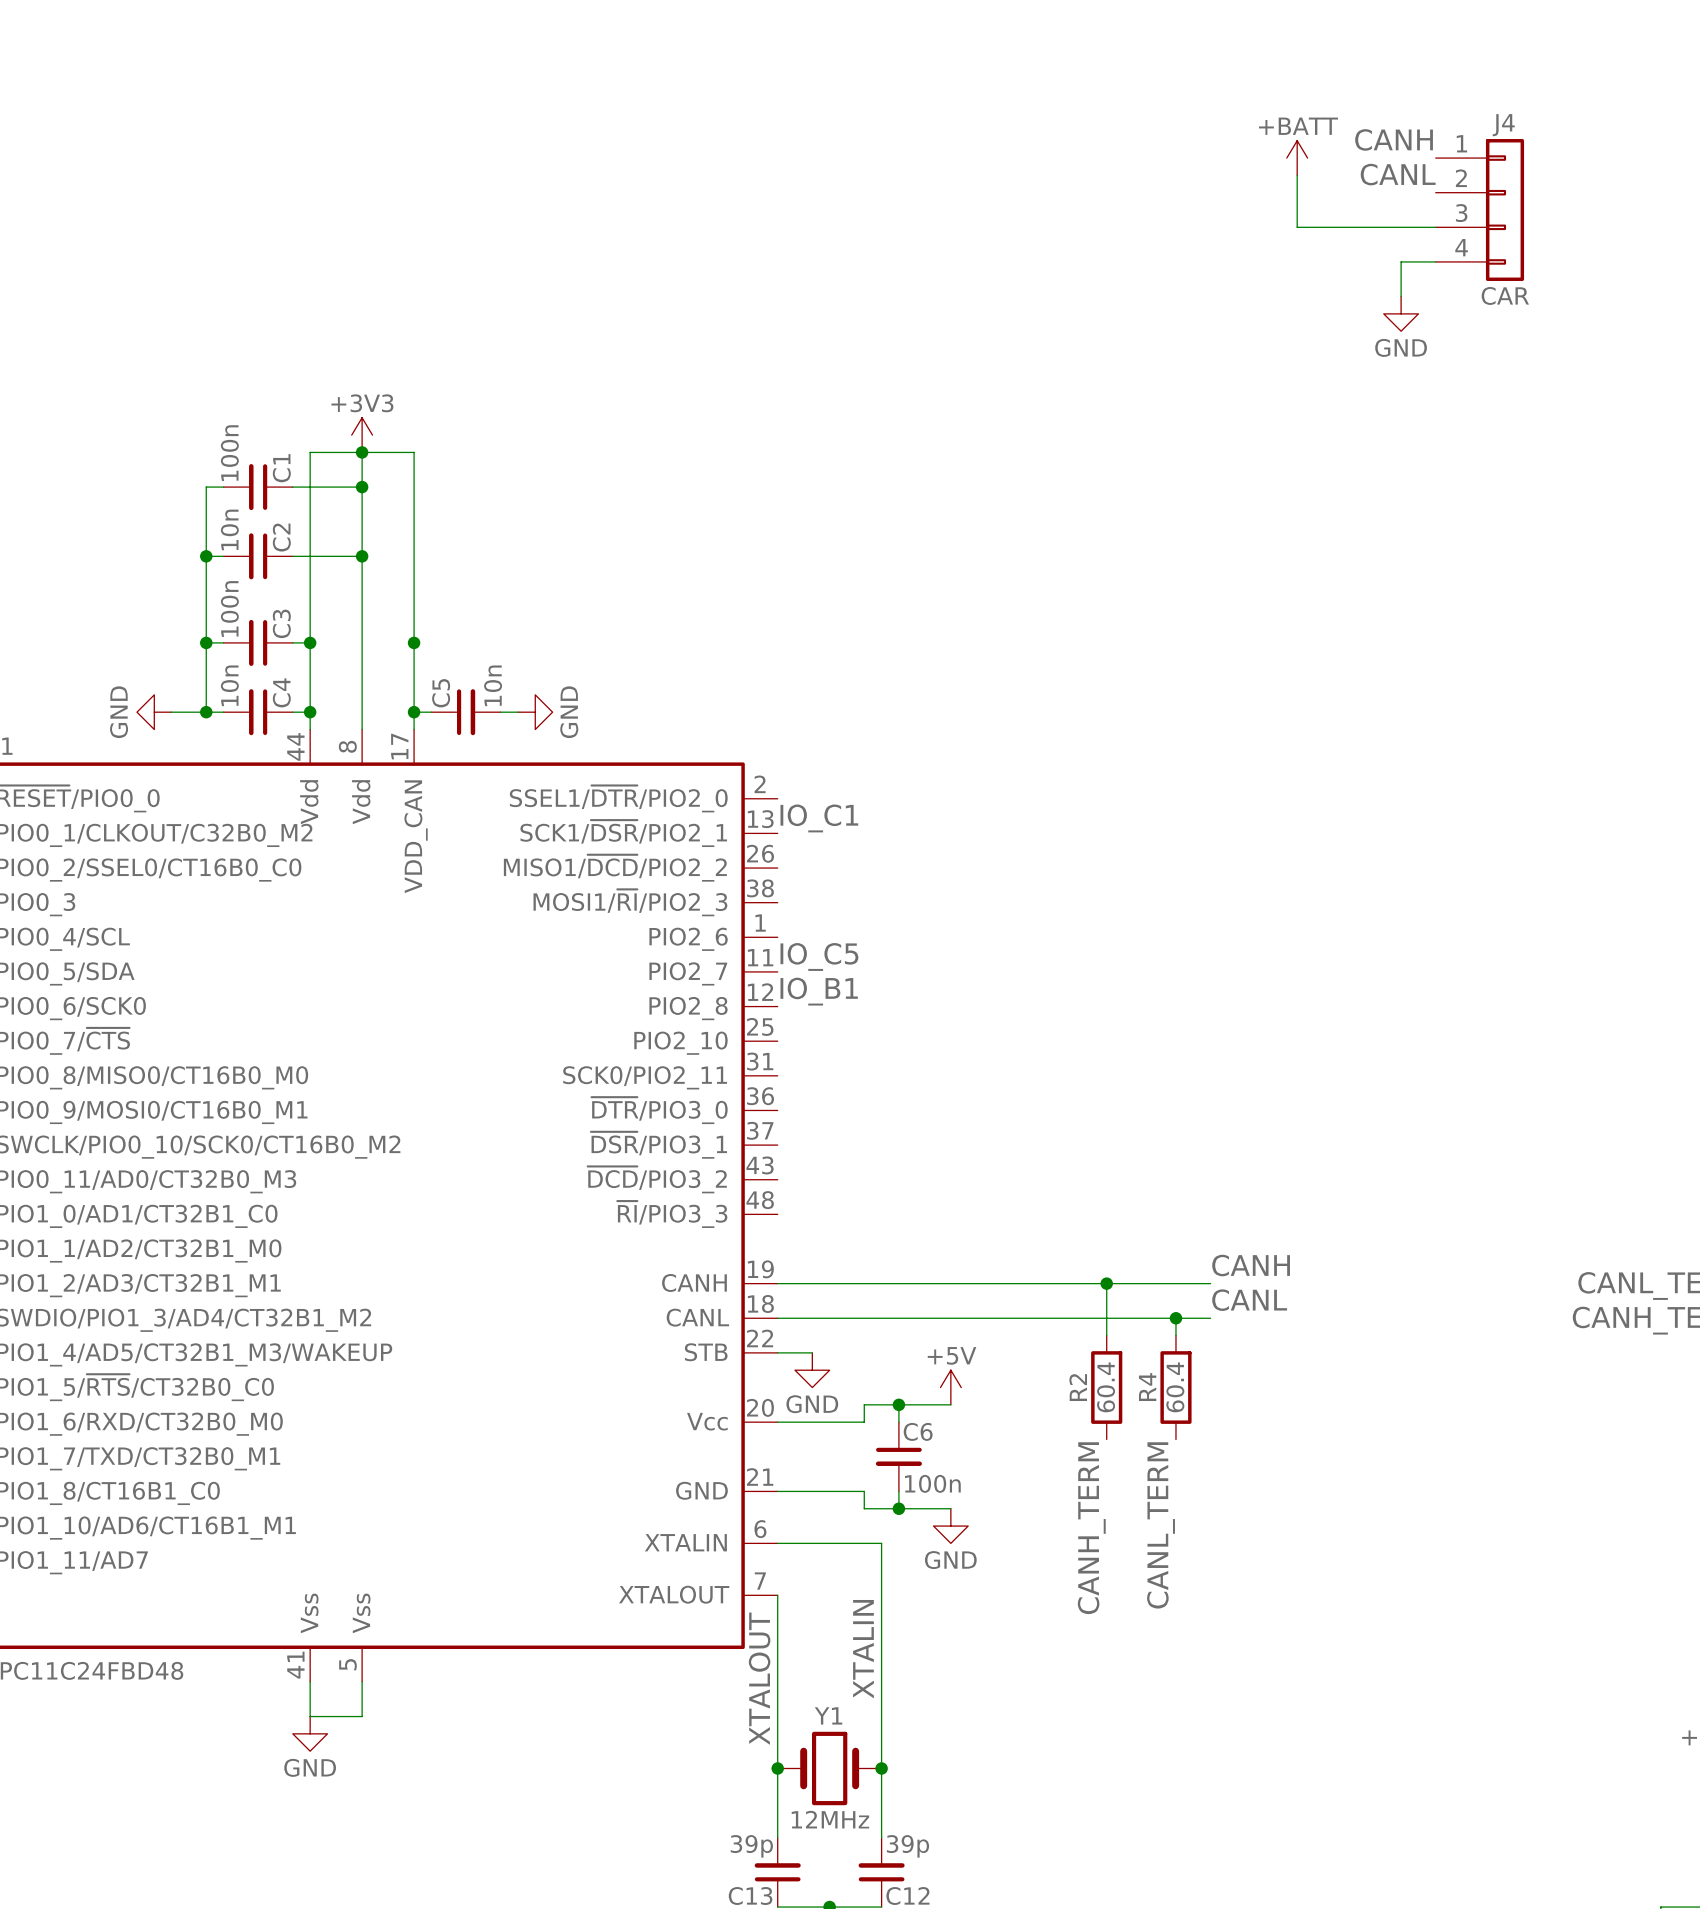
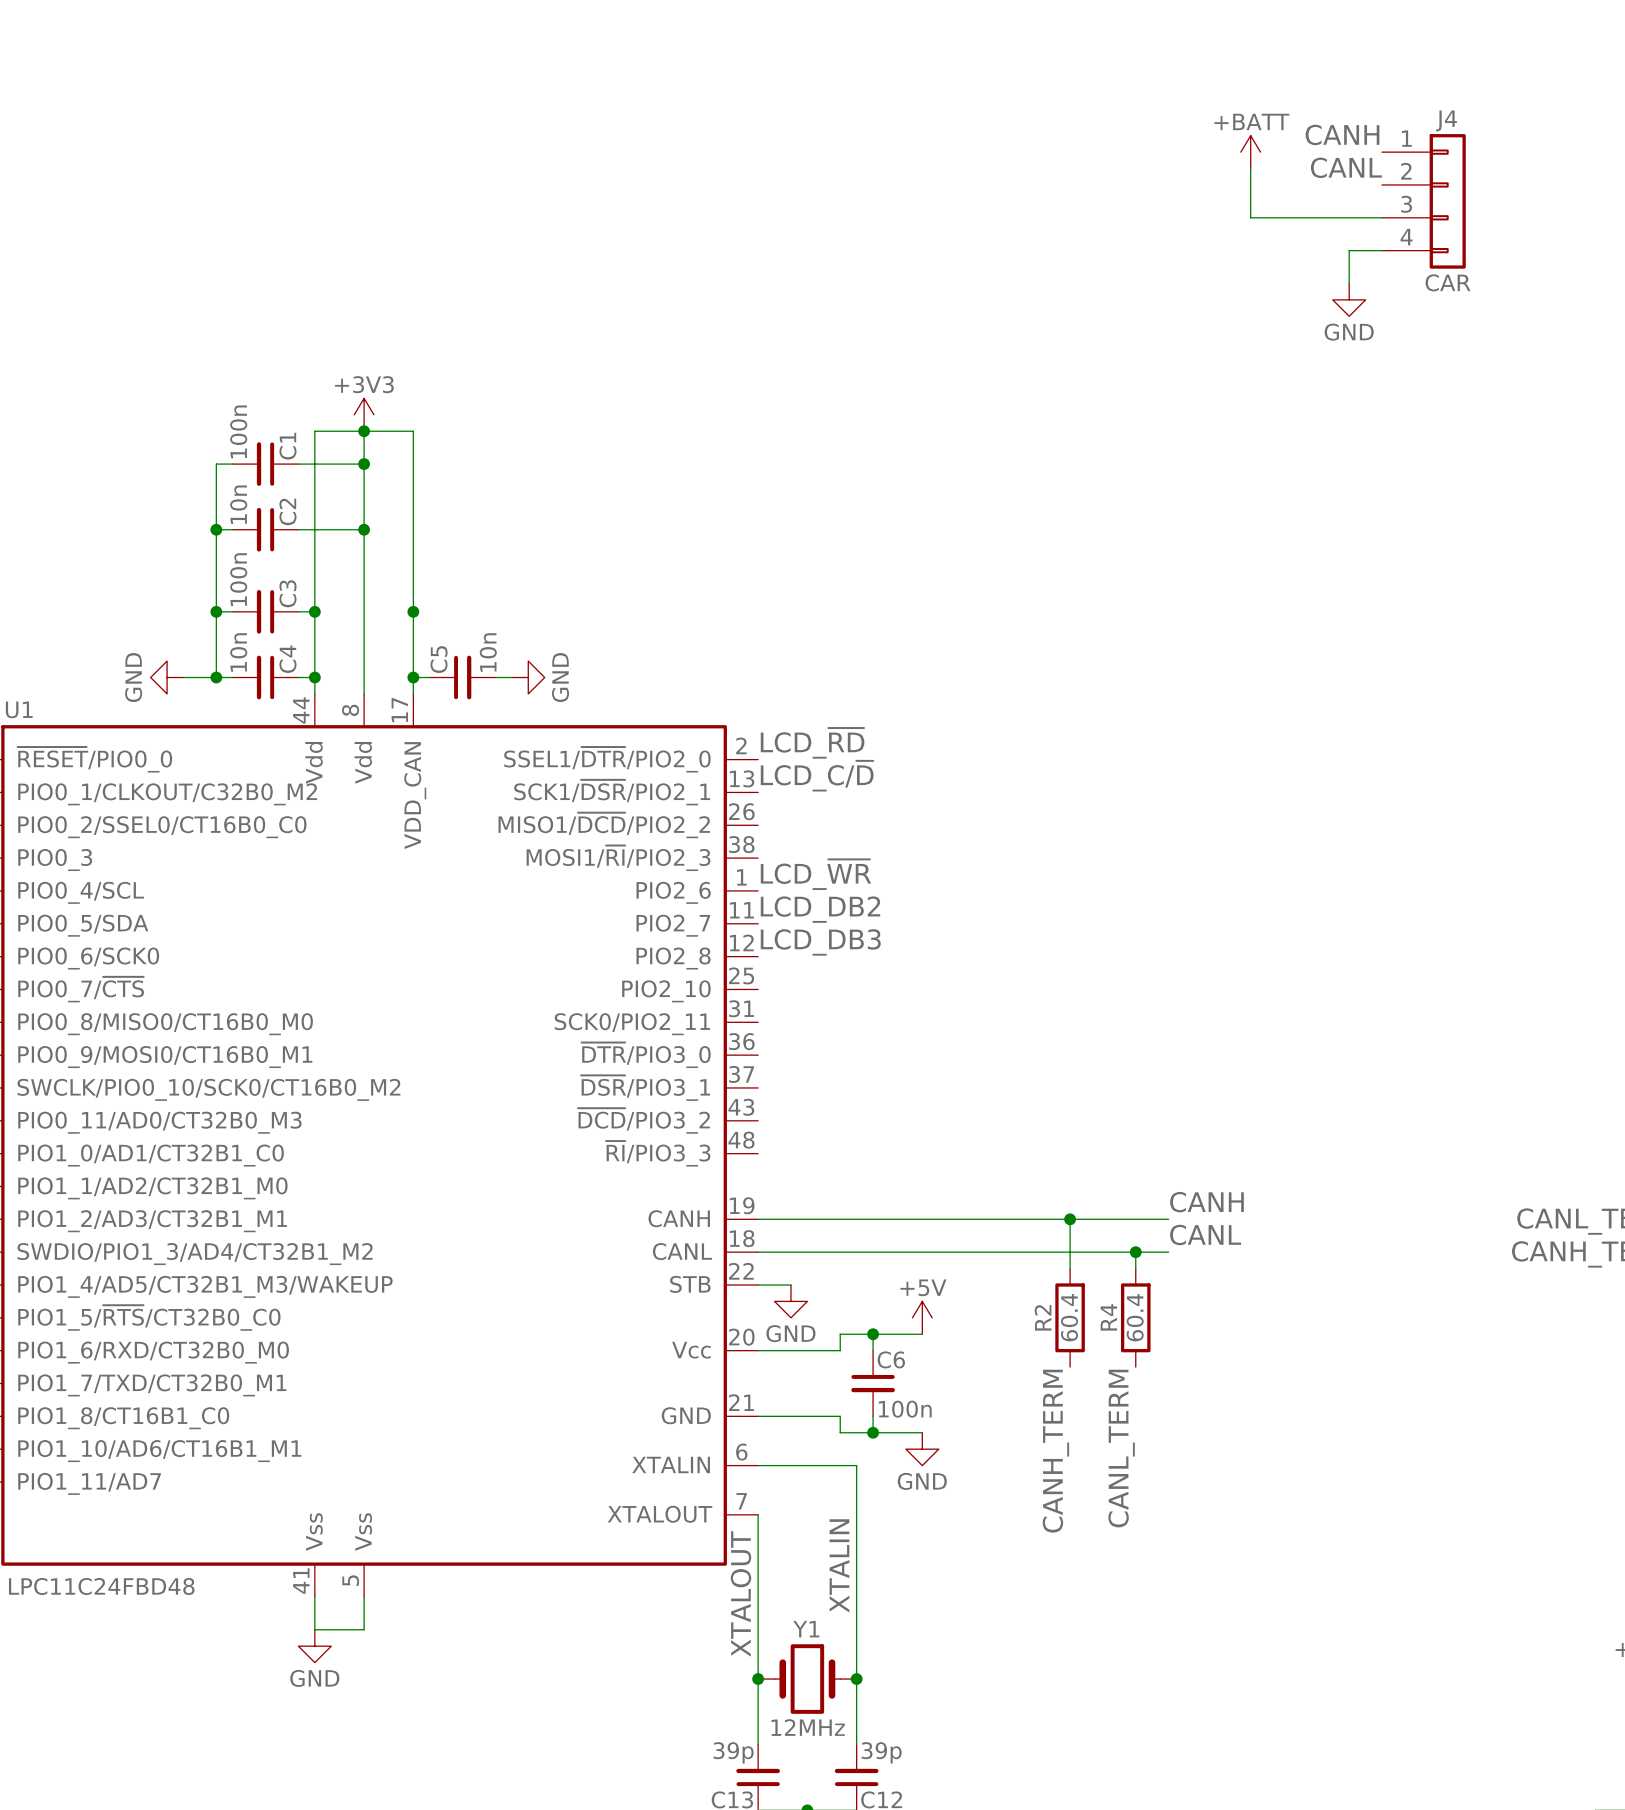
label: none -> LCD_~{RD} (812, 743)
label: IO_C1 (819, 818) -> LCD_C/~{D} (817, 776)
label: none -> LCD_~{WR} (815, 874)
label: IO_C5 (819, 956) -> LCD_DB2 (820, 909)
label: IO_B1 (819, 991) -> LCD_DB3 (820, 942)

